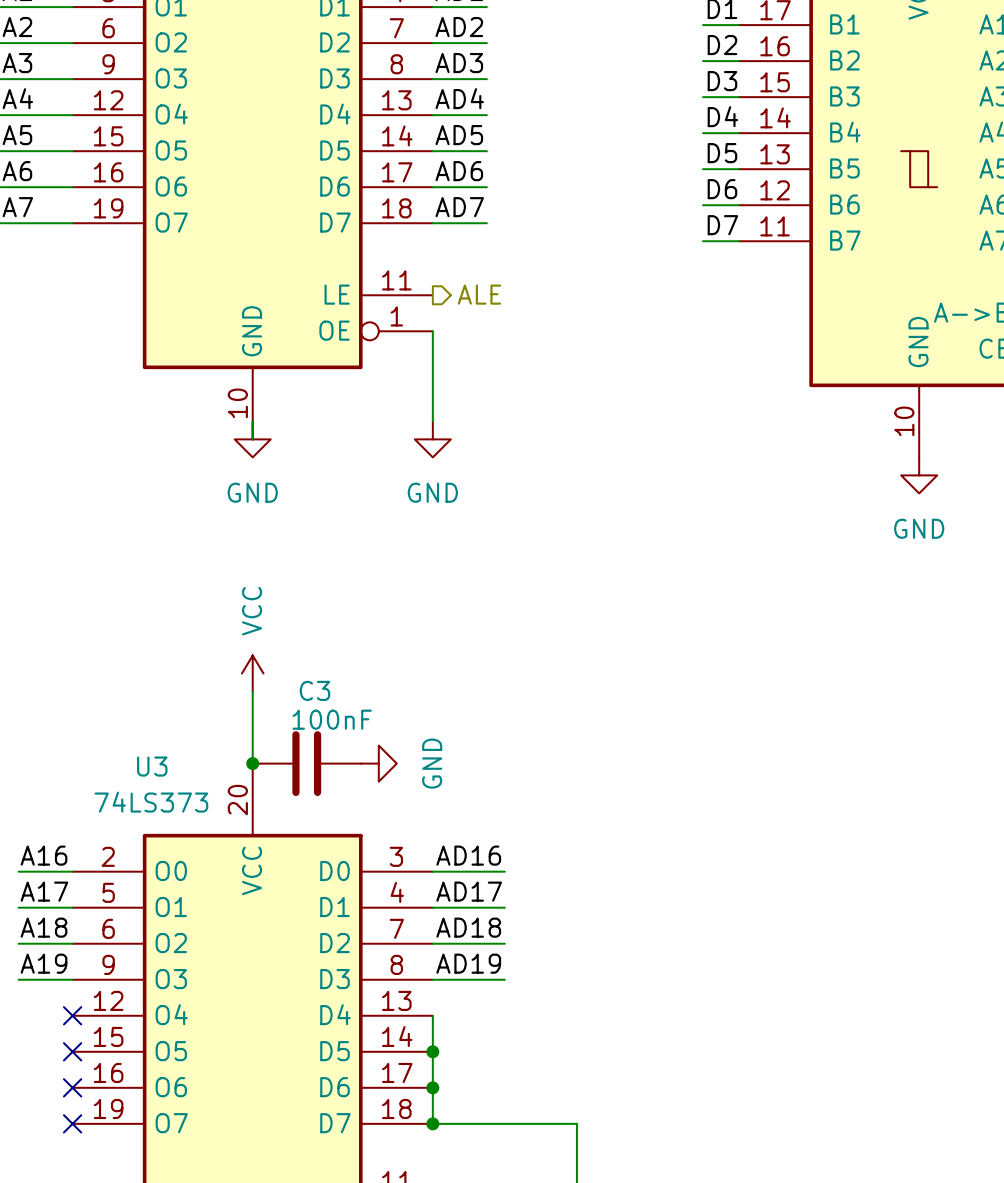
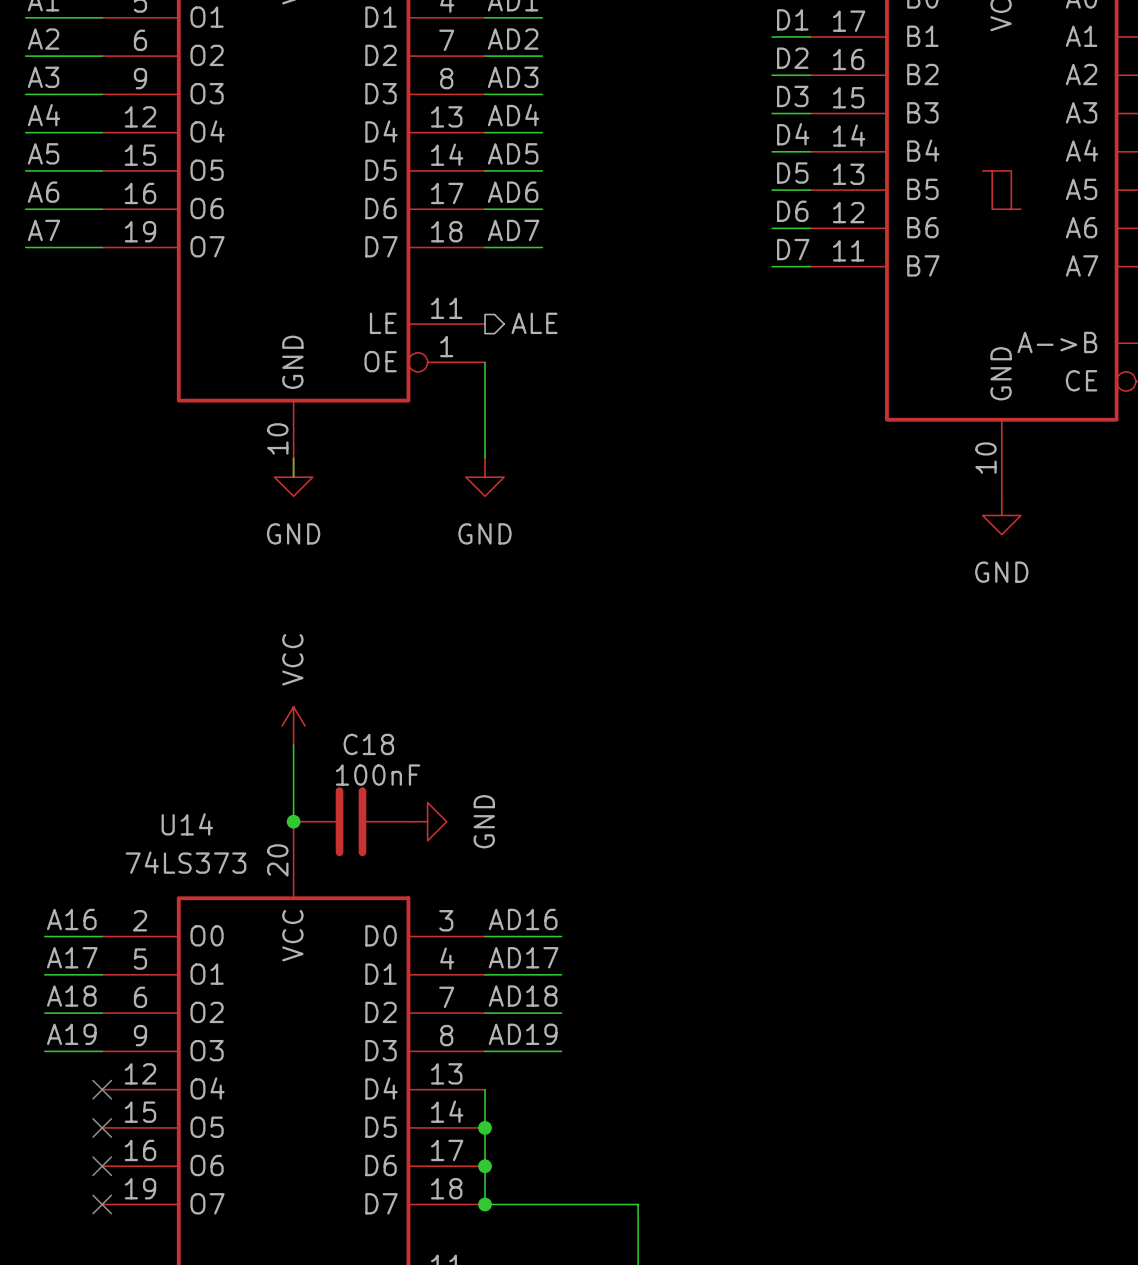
C3 name: C3 (314, 690) -> C18 (368, 744)
U3 name: U3 (152, 766) -> U14 (187, 824)

